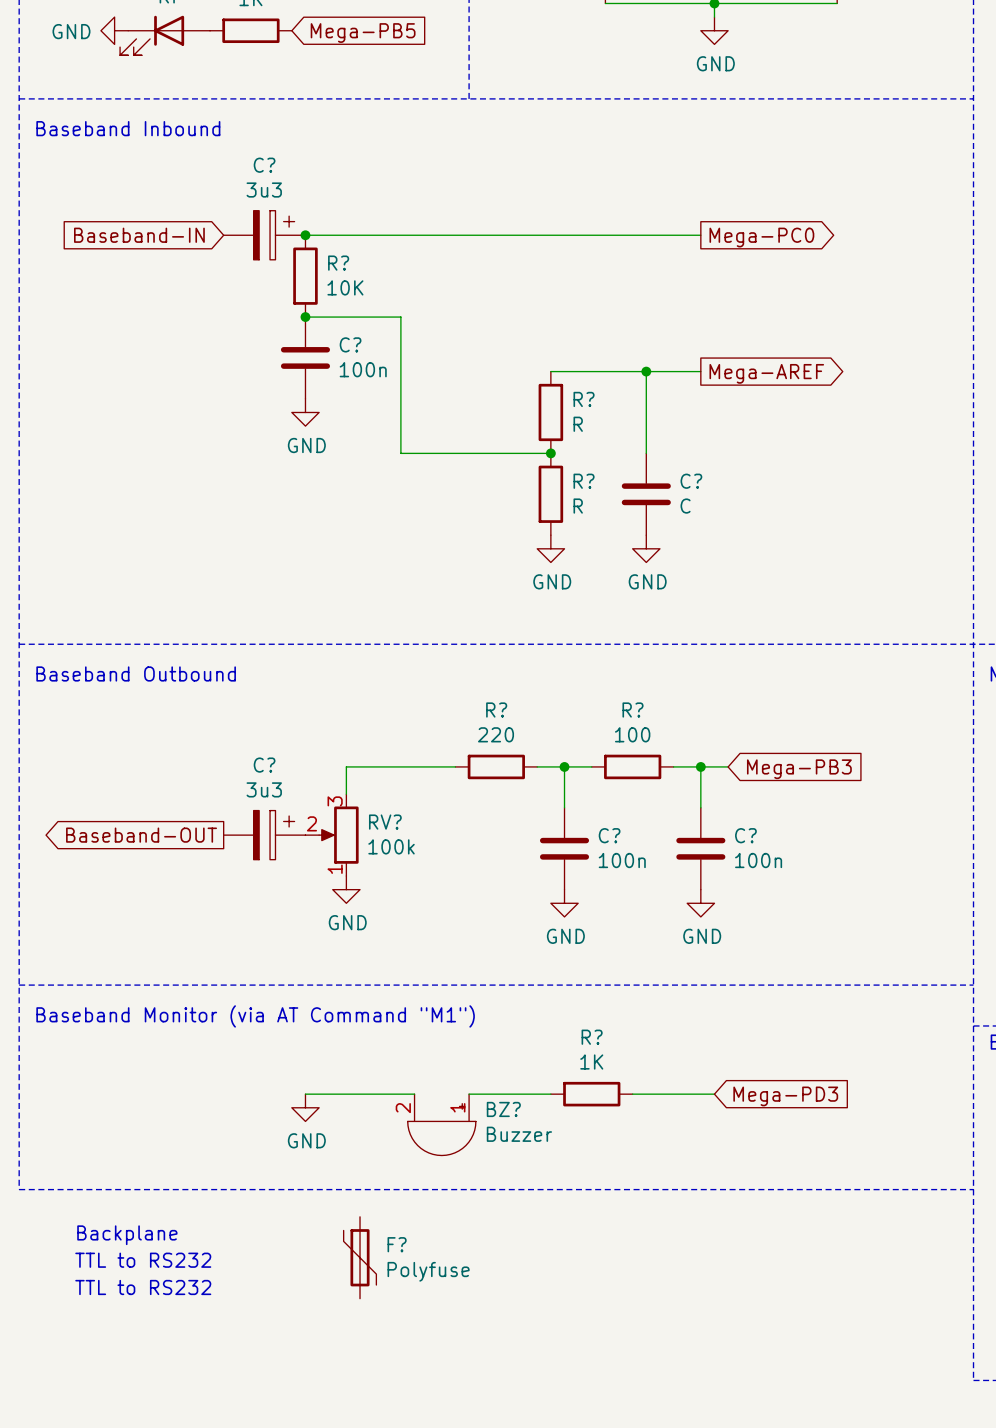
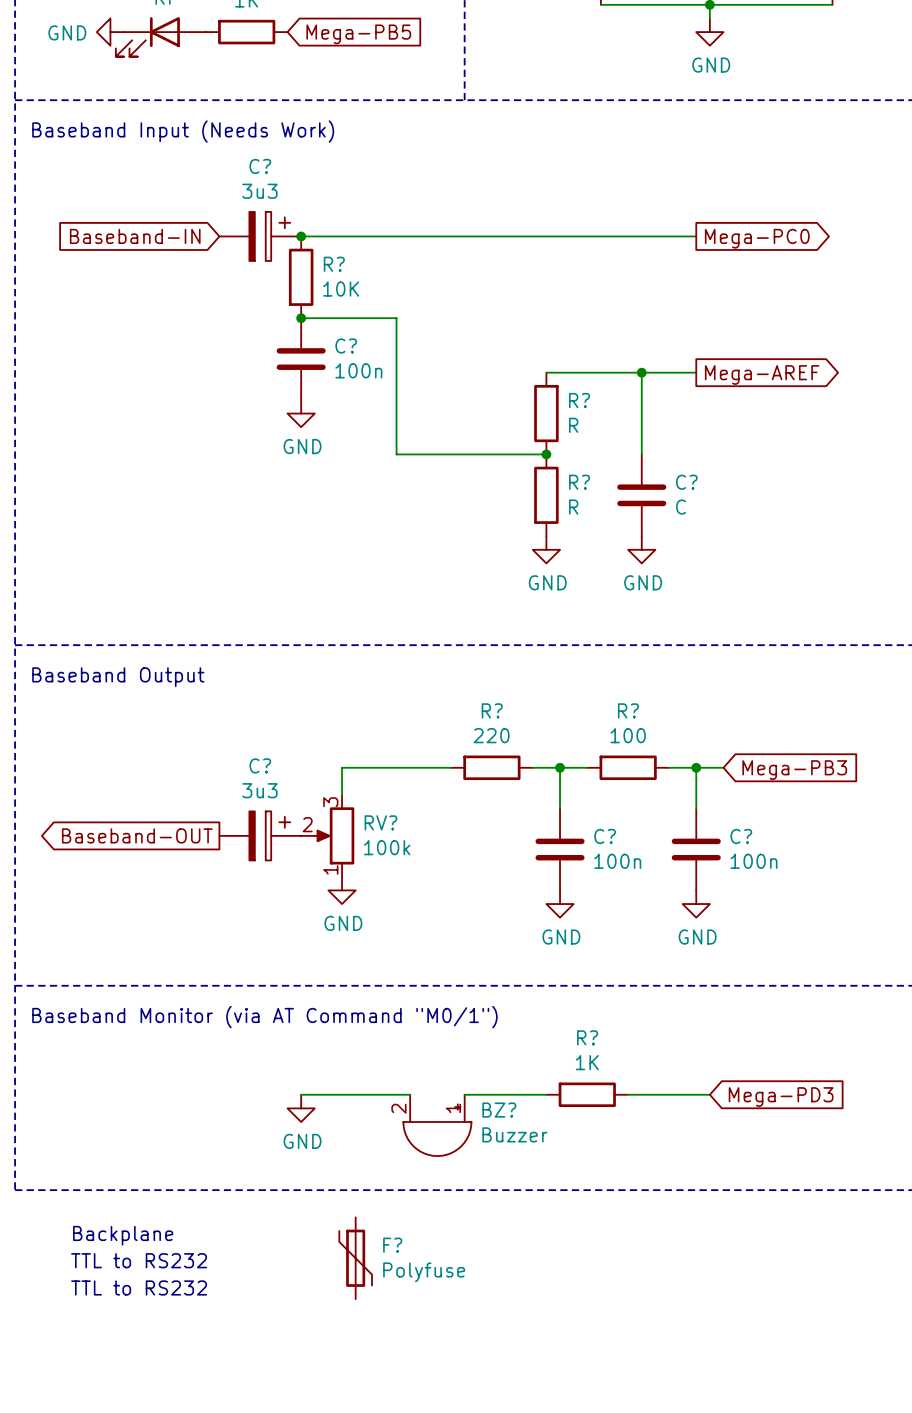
text: Baseband Inbound (128, 128) -> Baseband Input (Needs Work) (183, 131)
text: Baseband Outbound (136, 673) -> Baseband Output (118, 677)
text: Baseband Monitor (via AT Command "M1") (255, 1016) -> Baseband Monitor (via AT Command "M0/1") (264, 1017)

